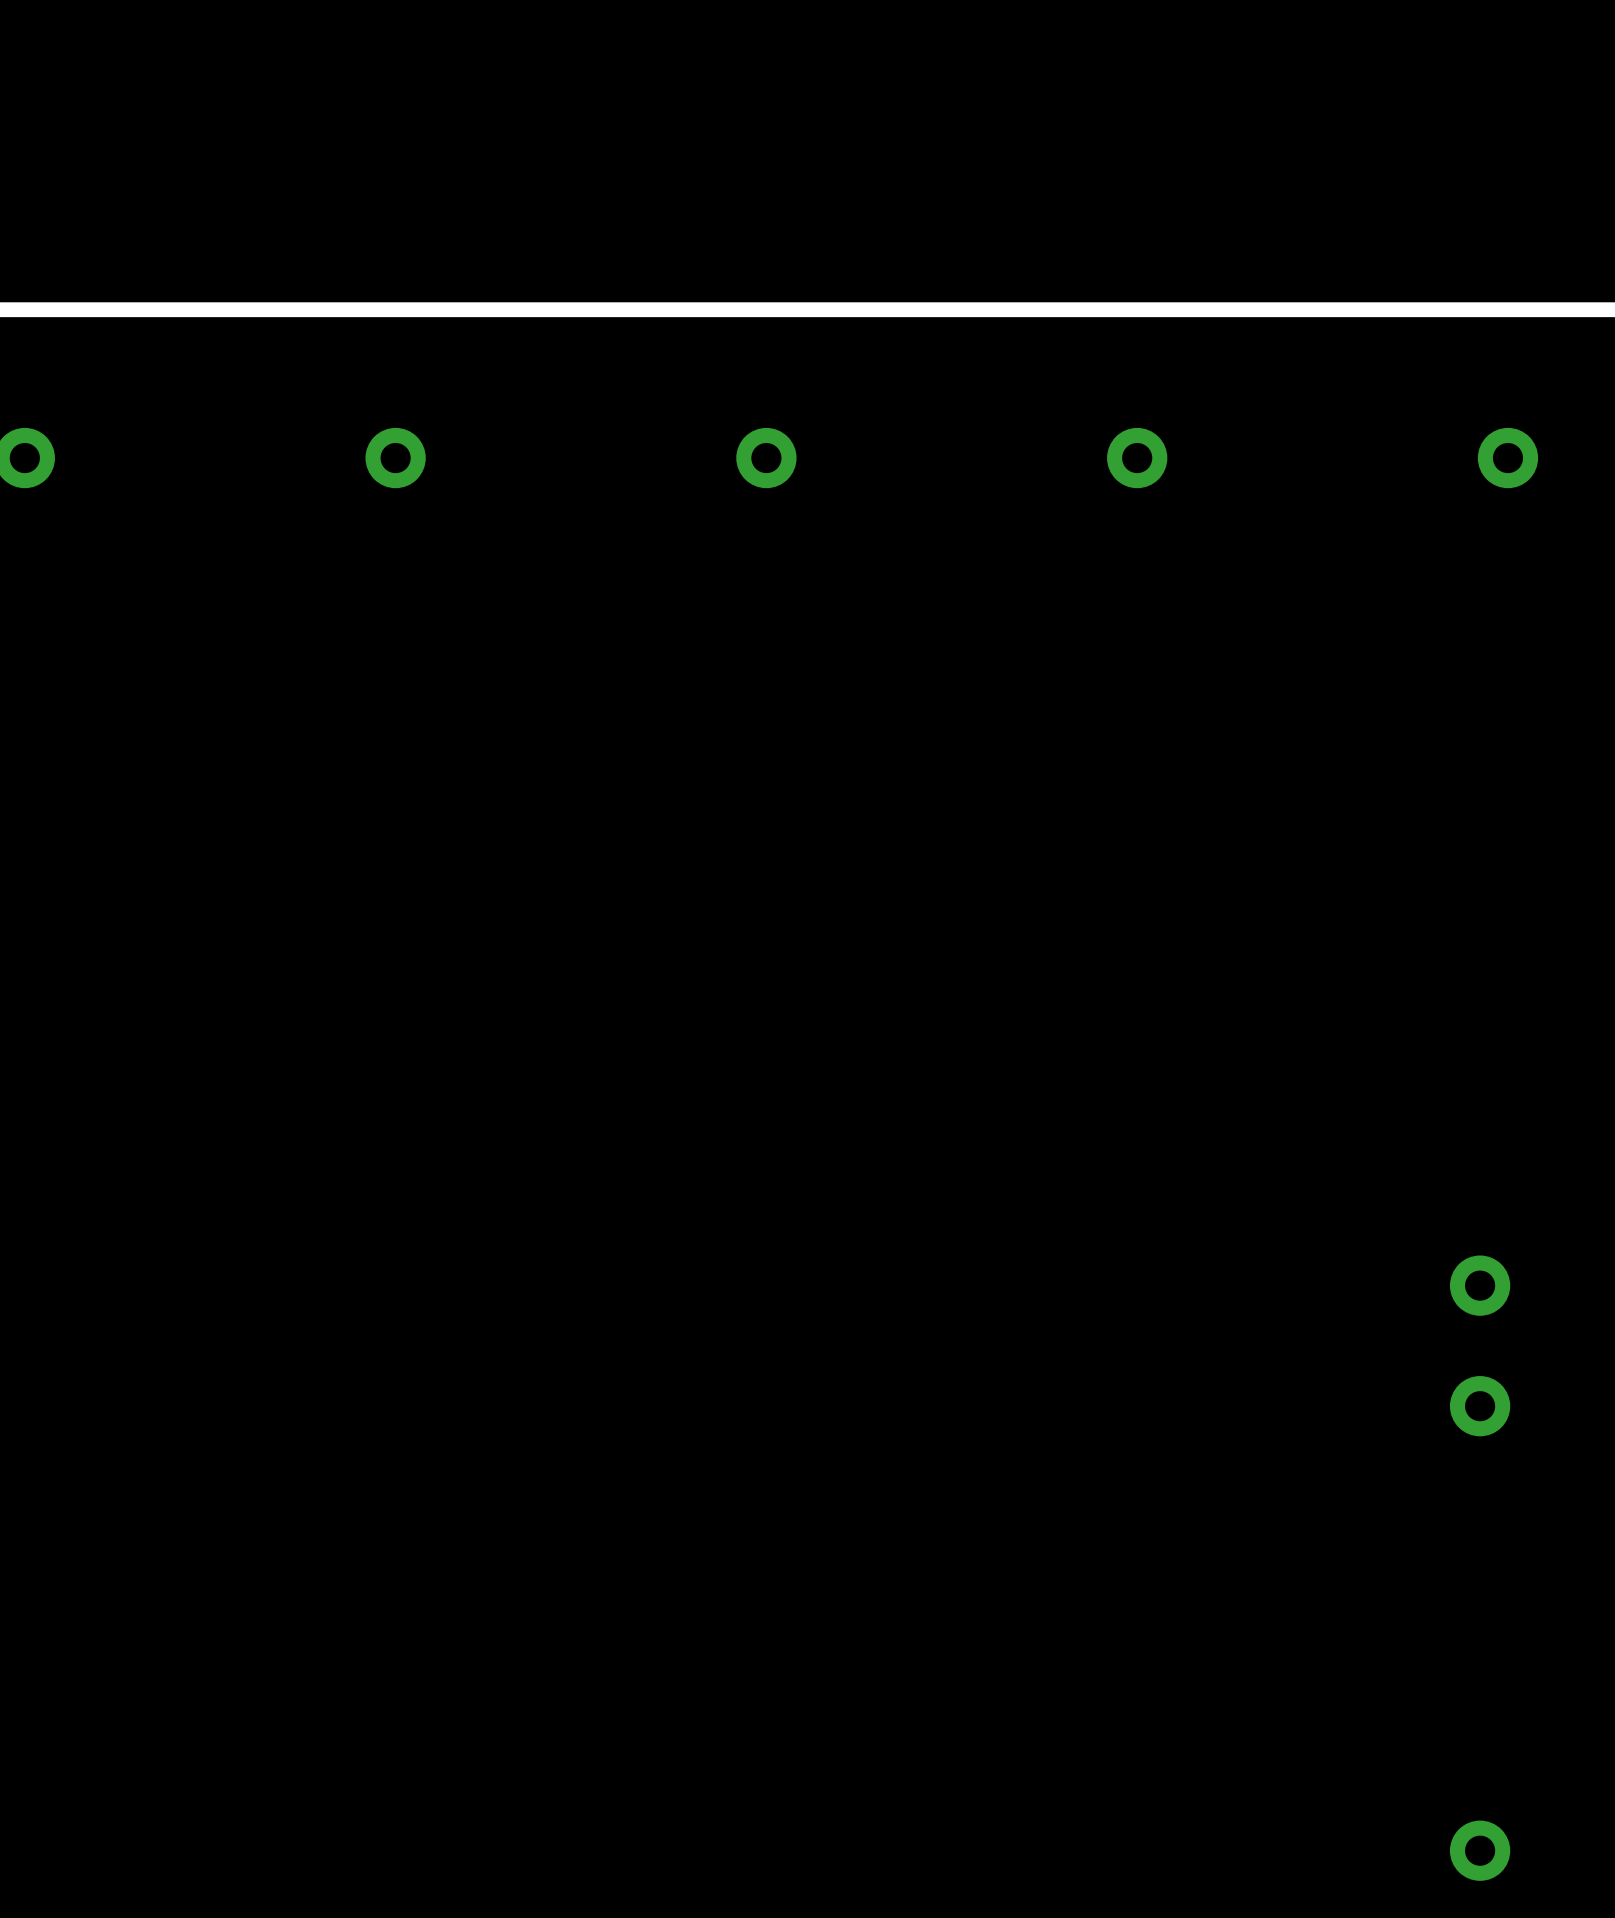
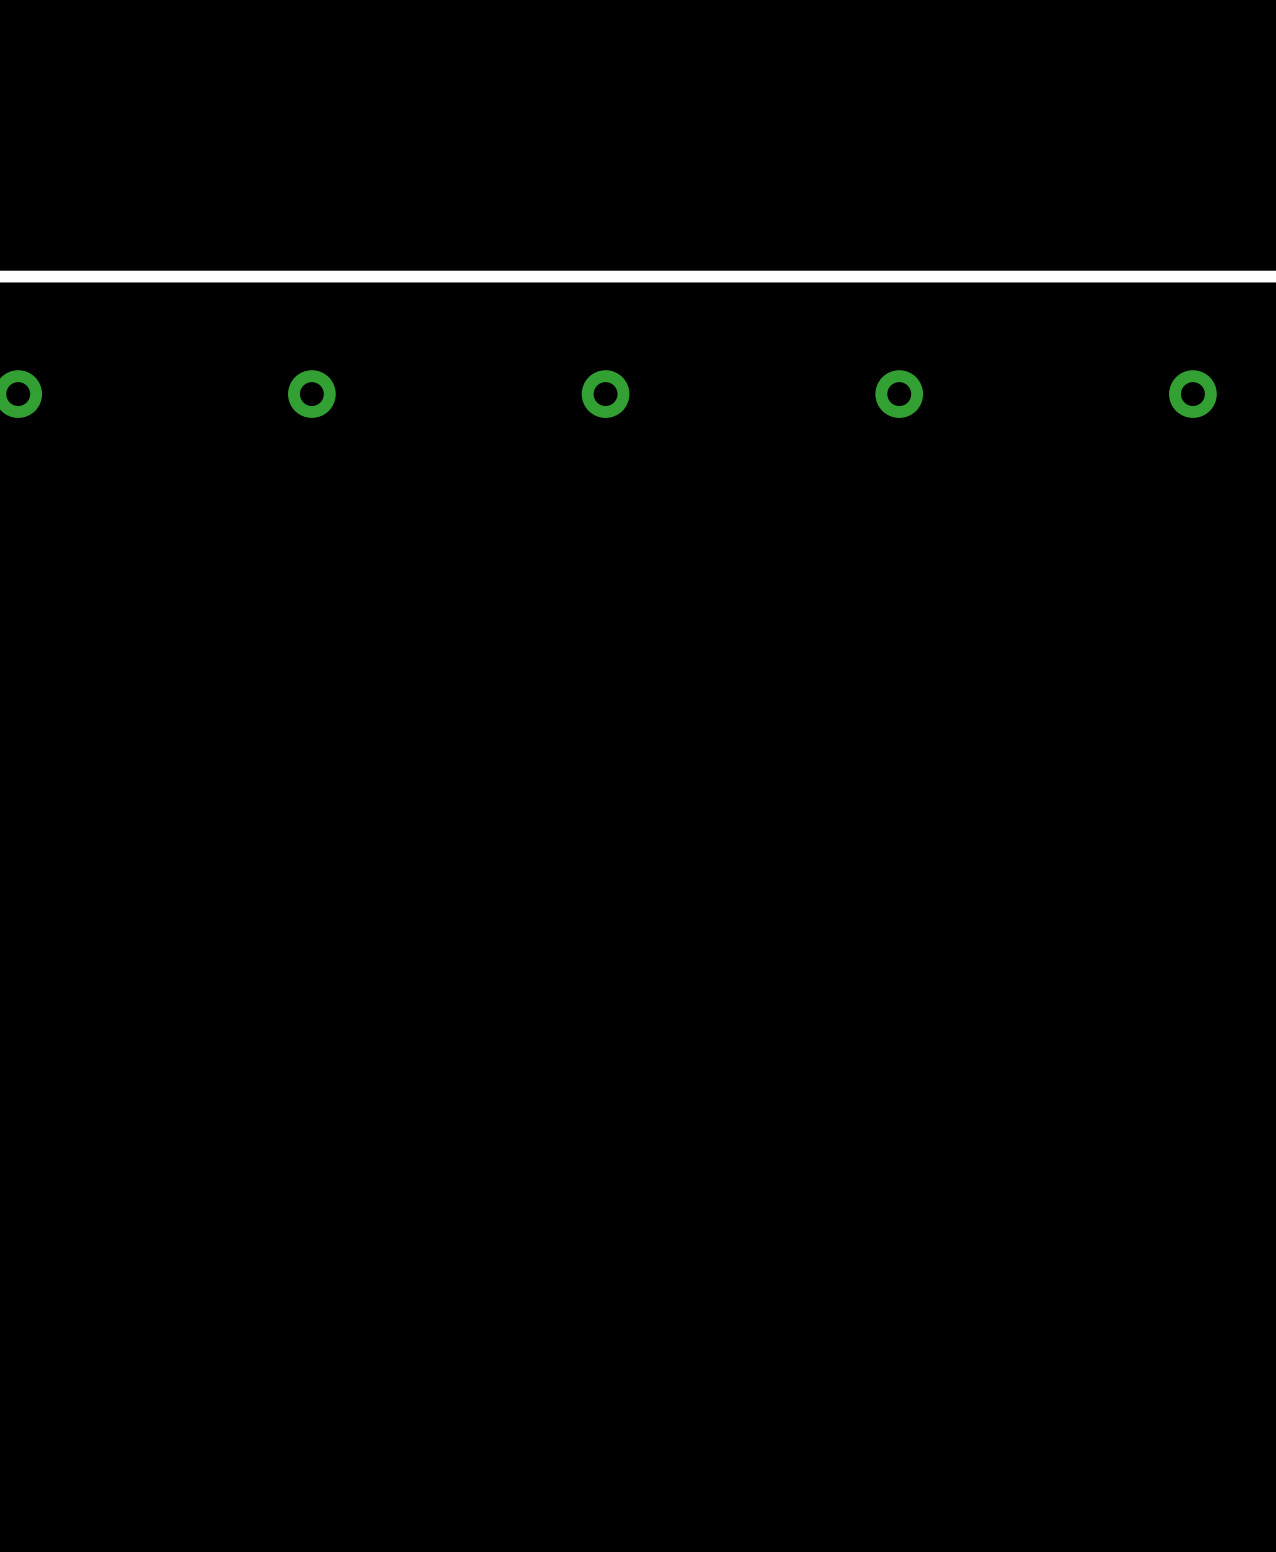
via: (1480, 1285) -> none
via: (1480, 1406) -> none
via: (1480, 1850) -> none

